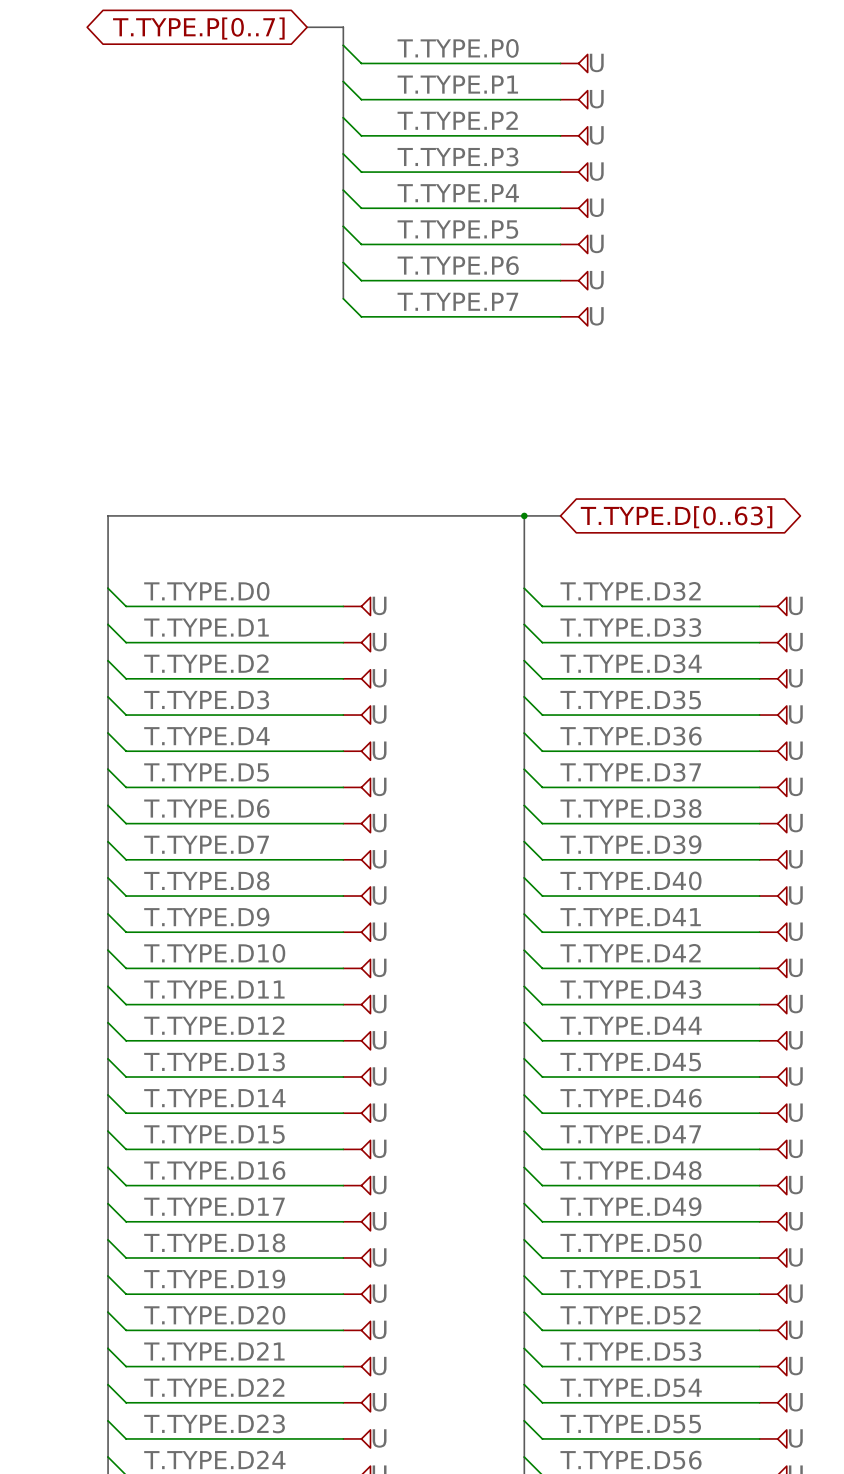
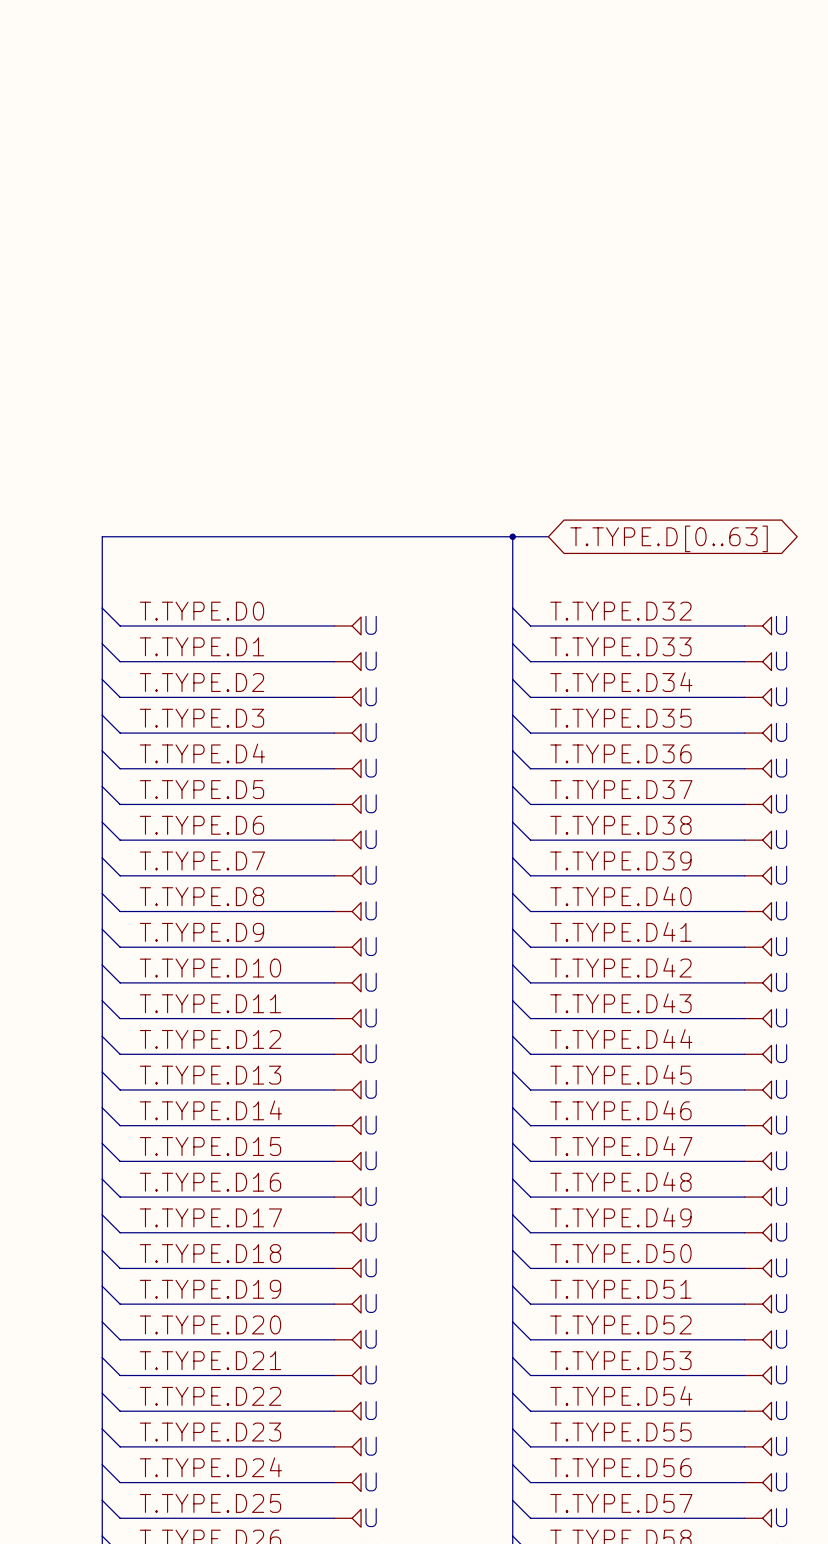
bus: (307, 27) (343, 27) (343, 298) -> none
global label: T.TYPE.P[0..7] (198, 28) -> none
wire: (343, 45) (361, 63) (560, 63) -> none
label: T.TYPE.P0 (458, 48) -> none
U: (574, 63) -> none
wire: (343, 81) (361, 99) (560, 99) -> none
label: T.TYPE.P1 (457, 84) -> none
U: (574, 99) -> none
wire: (343, 117) (361, 135) (560, 135) -> none
label: T.TYPE.P2 (457, 120) -> none
U: (574, 135) -> none
wire: (343, 153) (361, 172) (560, 172) -> none
label: T.TYPE.P3 (457, 157) -> none
U: (574, 172) -> none
wire: (343, 190) (361, 208) (560, 208) -> none
label: T.TYPE.P4 (458, 193) -> none
U: (574, 208) -> none
wire: (343, 226) (361, 244) (560, 244) -> none
label: T.TYPE.P5 (457, 229) -> none
U: (574, 244) -> none
wire: (343, 262) (361, 280) (560, 280) -> none
label: T.TYPE.P6 (458, 265) -> none
U: (574, 280) -> none
wire: (343, 298) (361, 316) (560, 316) -> none
label: T.TYPE.P7 (457, 301) -> none
U: (574, 316) -> none

